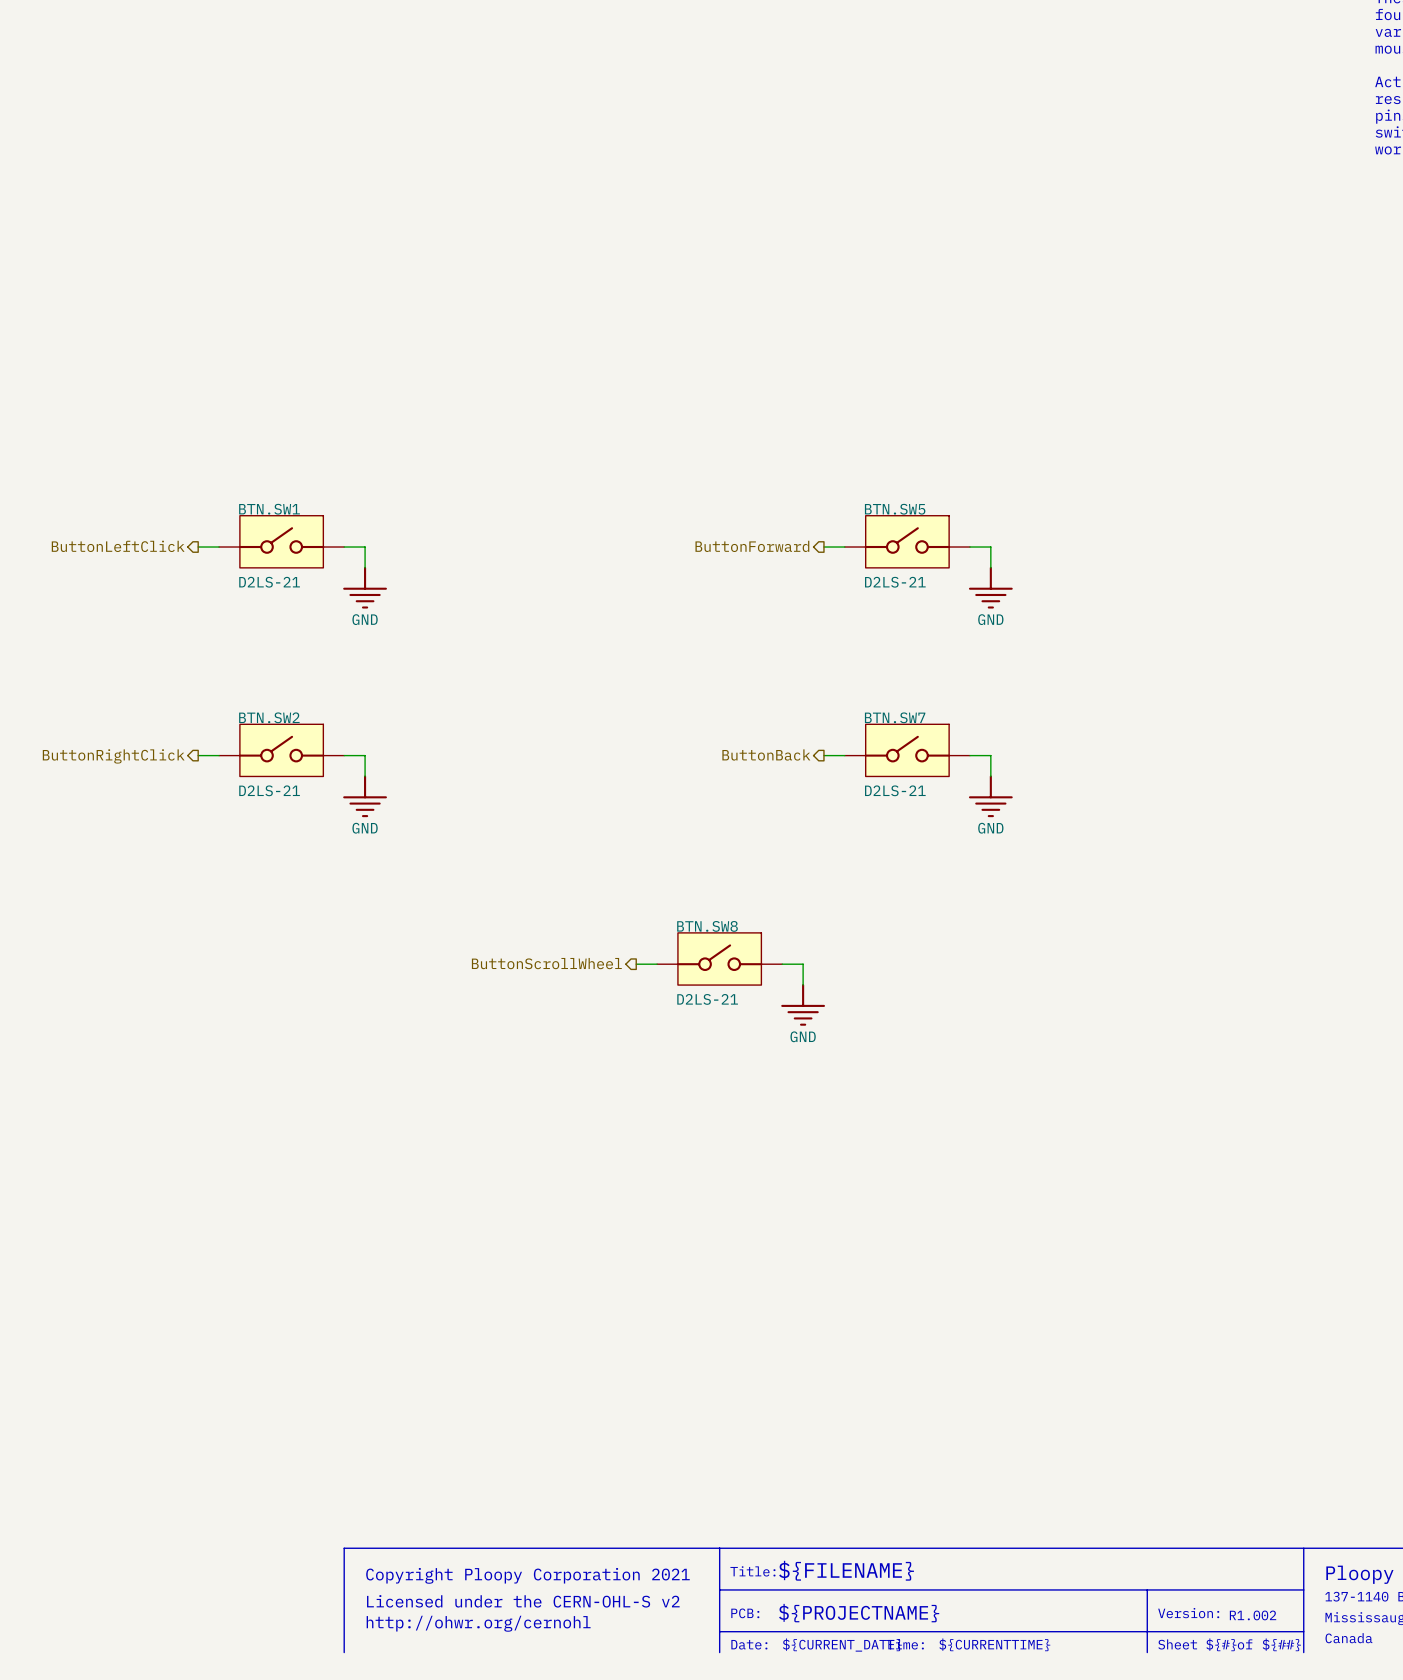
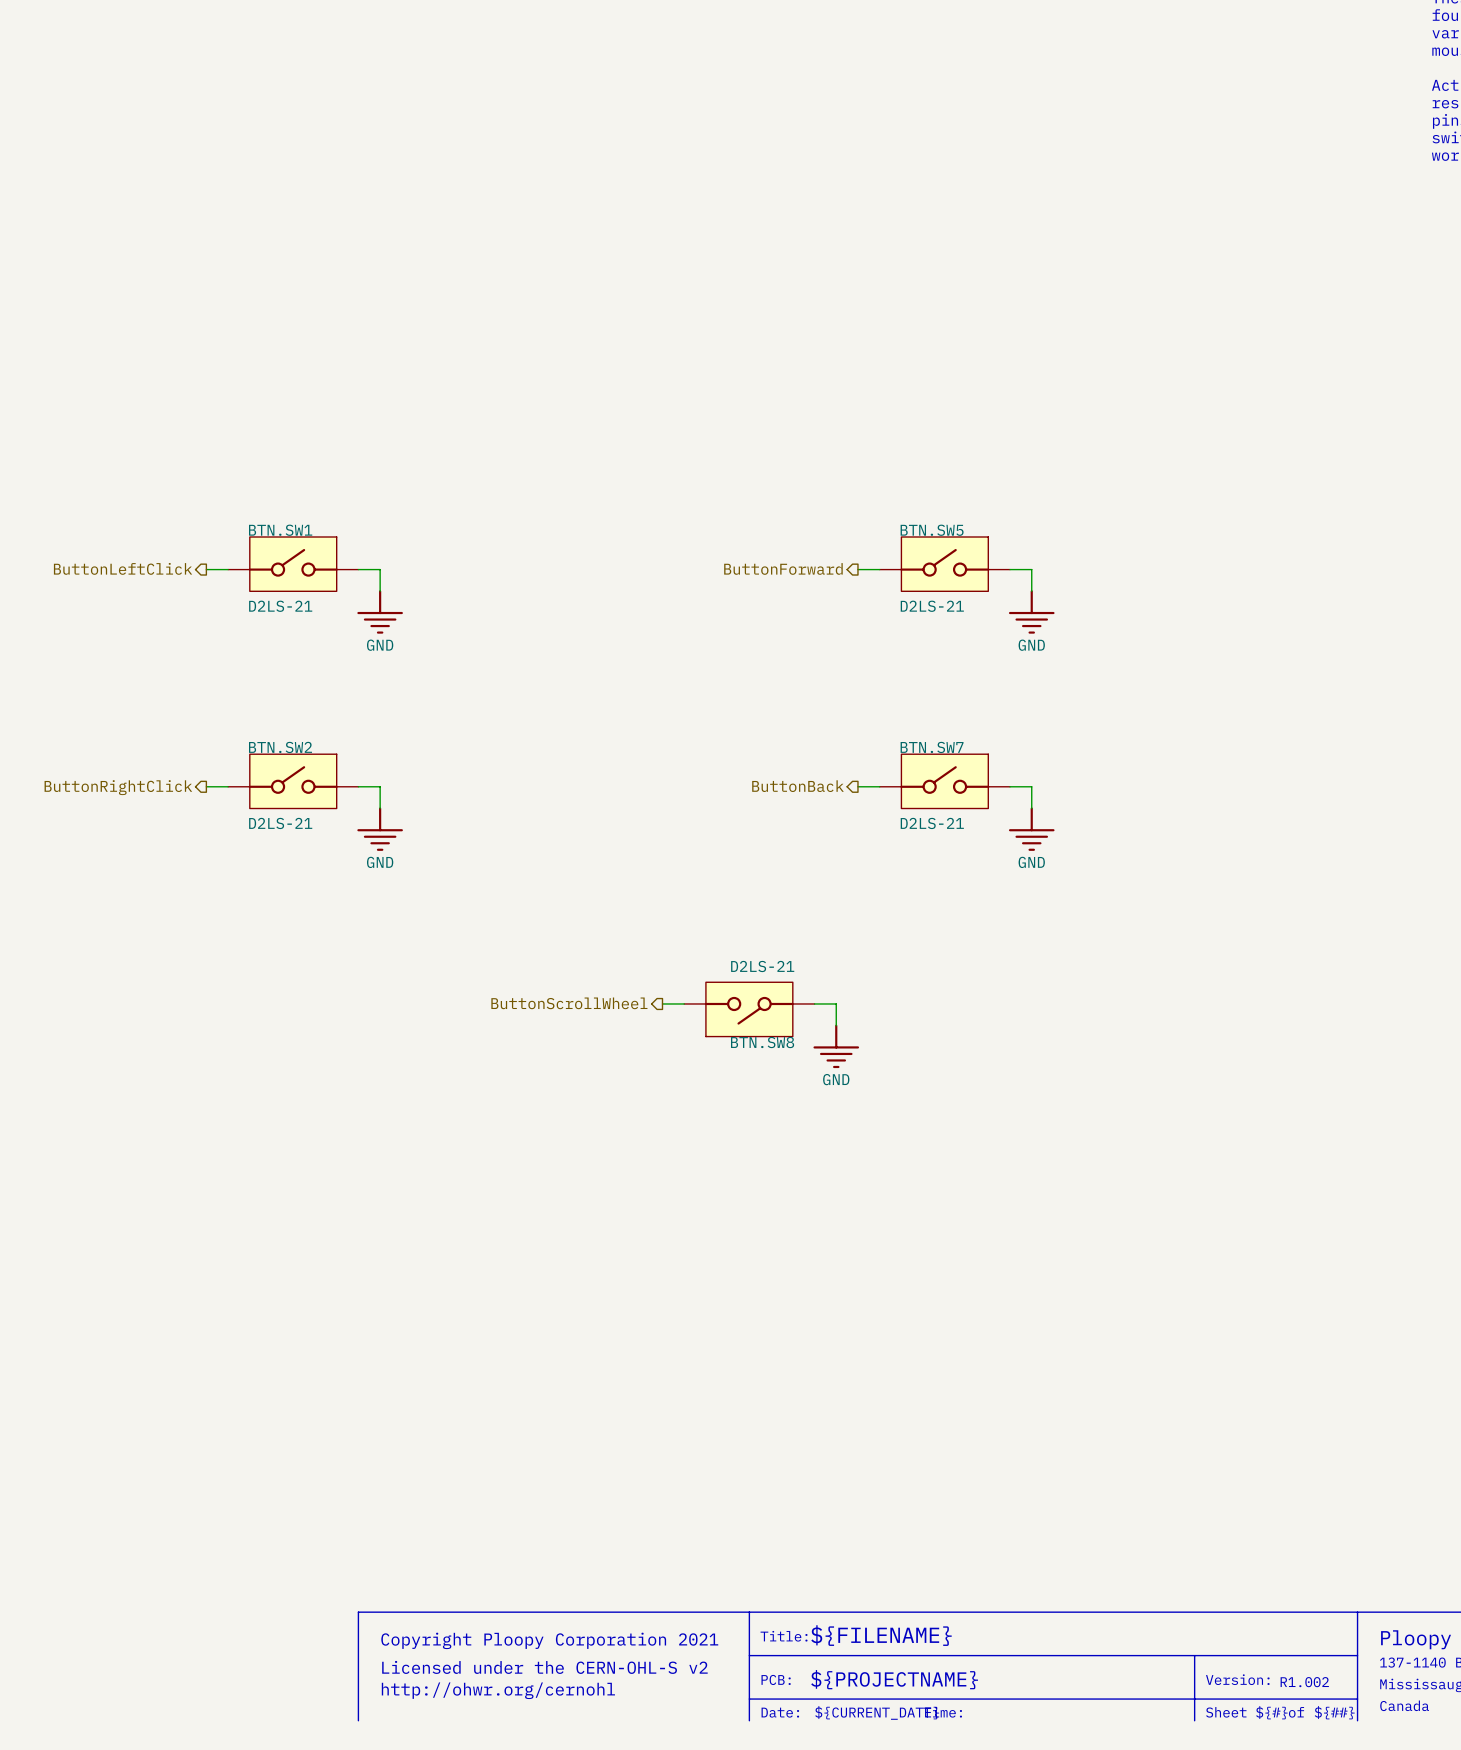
BTN.SW8 rotation: 0° (719, 958) -> 180° (749, 1009)
text: ${CURRENTTIME} (994, 1644) -> none

